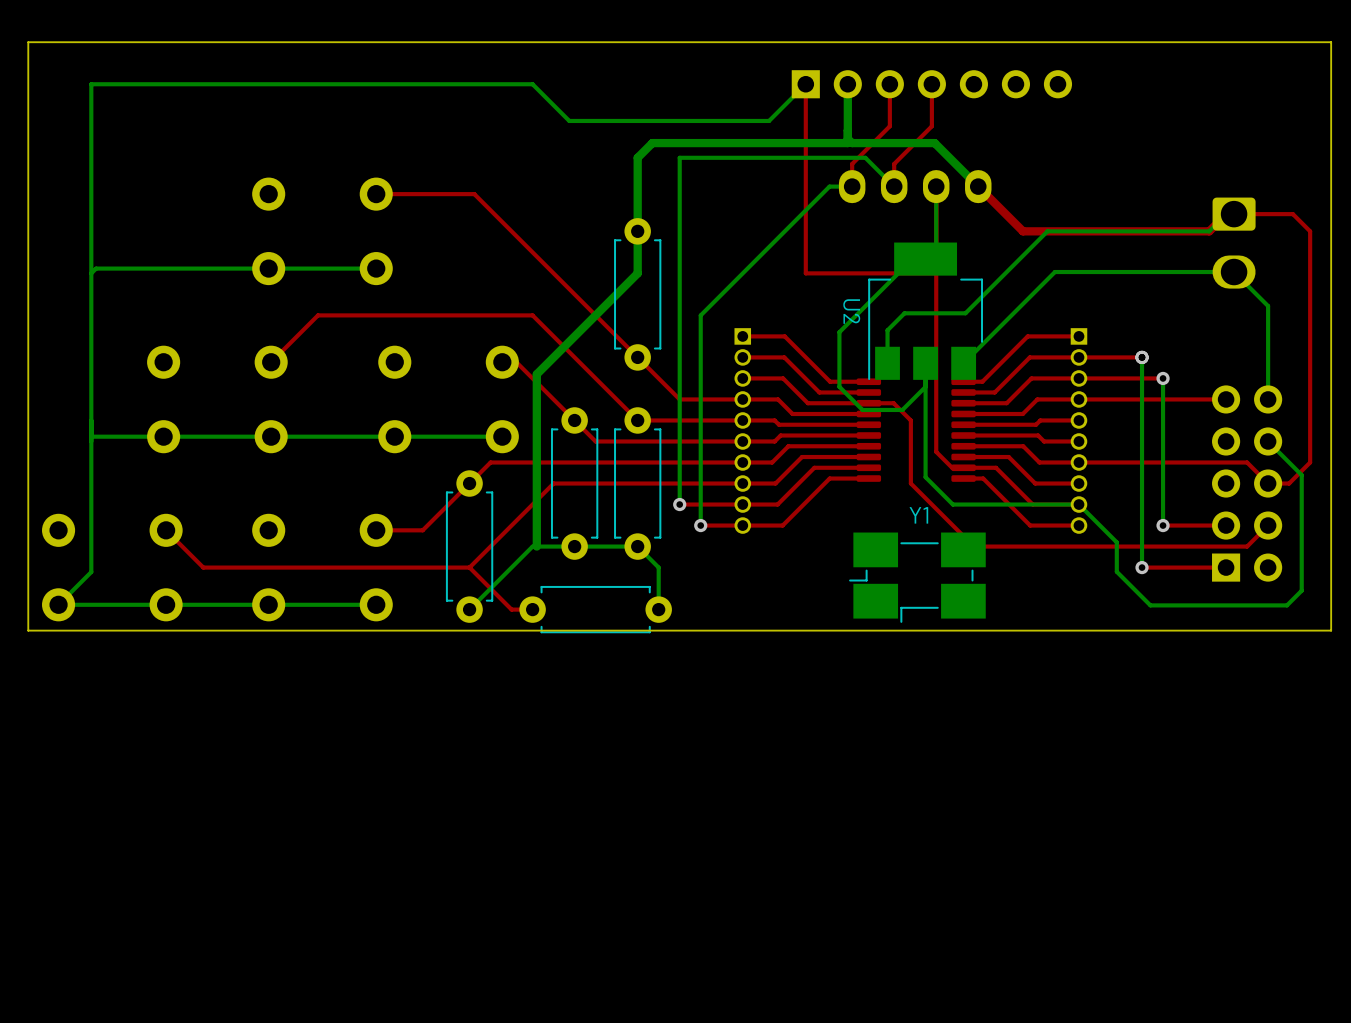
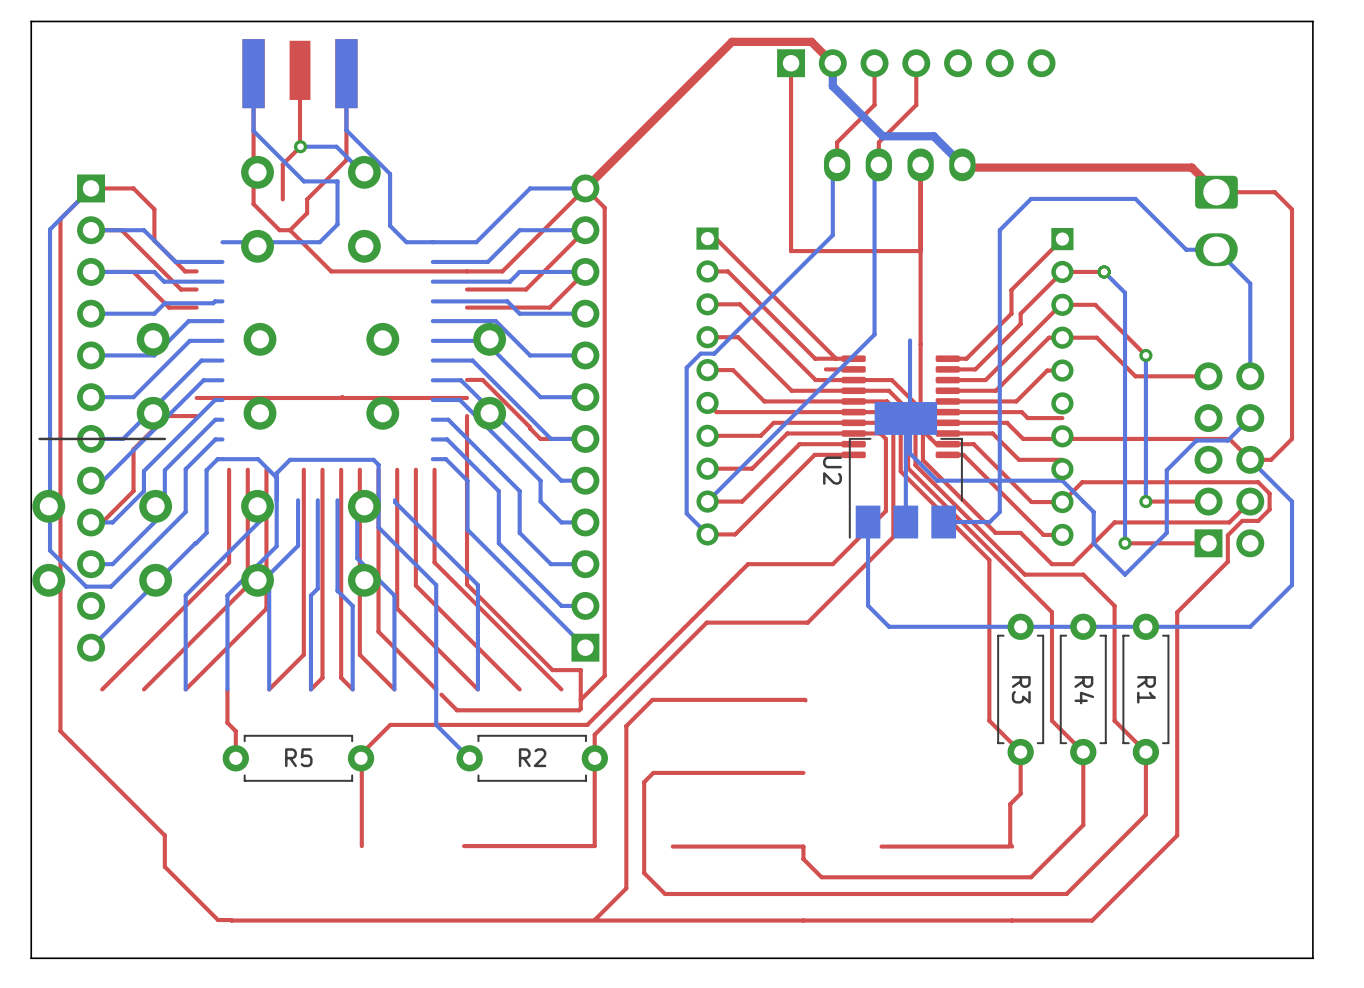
board edge: (40, 42) (28, 42) (28, 630) (1331, 630) -> (31, 21) (31, 958) (1312, 958) (1312, 605)
bottom track: (805, 84) (769, 120) (569, 120) (532, 84) (91, 84) (91, 572) (58, 604) (376, 604) -> none
top track: none -> (832, 63) (811, 41) (732, 41) (592, 181)
top track: none -> (300, 70) (300, 146) (282, 164) (282, 199)
top track: none -> (253, 73) (253, 204) (279, 230) (290, 230)
bottom track: none -> (253, 73) (253, 131) (303, 181) (337, 181) (337, 224) (319, 242) (222, 242)
part: none -> (300, 73)
top track: none -> (346, 73) (346, 160) (307, 199) (307, 213) (290, 230)
bottom track: none -> (346, 73) (346, 130) (390, 174) (390, 225) (406, 242) (476, 242) (530, 188) (585, 188)
bottom track: (847, 107) (847, 143) (652, 143) (637, 157) (637, 273) (536, 374) (536, 546) -> none
bottom track: (847, 138) (852, 143) (934, 143) (949, 157) -> (832, 86) (882, 136) (933, 136)
bottom track: none -> (300, 146) (336, 146) (363, 174) (363, 181)
via: none -> (300, 146)
bottom track: (852, 186) (829, 186) (700, 315) (700, 390) -> (832, 167) (832, 235) (714, 353) (700, 353) (686, 367)
bottom track: (894, 186) (865, 157) (679, 157) (679, 504) -> none
bottom track: (936, 186) (936, 250) (925, 259) (912, 259) (839, 332) (839, 386) (862, 409) (902, 409) (925, 386) -> none
bottom track: none -> (874, 167) (874, 334) (707, 501)
top track: (980, 189) (1023, 231) (1209, 231) (1230, 210) -> (965, 167) (1191, 167) (1212, 188)
top track: (376, 194) (474, 194) (679, 399) (778, 399) (792, 414) (806, 414) -> (707, 337) (738, 337) (791, 390)
bottom track: none -> (91, 188) (50, 229) (50, 550) (86, 586) (111, 586) (185, 512) (185, 469) (215, 439) (222, 439)
bottom track: (1226, 214) (1209, 231) (1047, 231) (965, 313) (904, 313) (887, 330) (887, 363) -> none
top track: none -> (91, 230) (121, 230) (181, 289) (196, 289)
bottom track: none -> (91, 230) (143, 230) (175, 261) (222, 261)
top track: none -> (290, 230) (331, 271) (502, 271) (585, 188) (604, 207) (604, 675) (580, 699)
top track: none -> (585, 230) (526, 289) (467, 289)
bottom track: none -> (585, 230) (519, 230) (487, 261) (432, 261)
top track: none -> (707, 238) (715, 238) (836, 358)
bottom track: (376, 268) (96, 268) (91, 273) -> none
bottom track: (1203, 272) (1054, 272) (963, 363) -> (1186, 249) (1135, 198) (1031, 198) (999, 230) (999, 512) (989, 522) (943, 522)
top track: none -> (91, 271) (133, 271) (169, 307) (196, 307)
bottom track: none -> (91, 271) (154, 271) (164, 281) (222, 281)
top track: none -> (585, 271) (549, 307) (467, 307)
bottom track: none -> (585, 271) (519, 271) (509, 281) (432, 281)
part: (637, 294) -> none
bottom track: none -> (1104, 271) (1125, 292) (1125, 334)
U2 position: (925, 311) -> (905, 470)
bottom track: none -> (222, 301) (213, 303) (164, 303) (154, 313) (91, 313)
bottom track: none -> (432, 301) (507, 301) (519, 313) (585, 313)
top track: (784, 336) (742, 336) -> (770, 313) (727, 271) (707, 271)
top track: (1078, 336) (1027, 336) -> (1062, 239) (1011, 290) (1011, 313)
bottom track: none -> (222, 321) (188, 321) (154, 355) (91, 355)
bottom track: none -> (432, 321) (495, 321) (530, 355) (585, 355)
top track: (742, 357) (784, 357) (819, 392) (840, 392) -> none
top track: (1142, 357) (1029, 357) (994, 392) (991, 392) -> (1104, 271) (1062, 271) (1020, 313) (1020, 324) (975, 369)
via position: (1142, 357) -> (1104, 271)
top track: (271, 362) (318, 315) (532, 315) (637, 420) (774, 420) -> (707, 370) (733, 370) (760, 397)
top track: (502, 362) (516, 362) (595, 441) (774, 441) (780, 435) -> (707, 402) (716, 412) (766, 412)
bottom track: none -> (222, 340) (189, 340) (133, 397) (91, 397)
bottom track: none -> (432, 340) (484, 340) (540, 397) (585, 397)
top track: (742, 378) (783, 378) (807, 403) (830, 403) -> (707, 304) (739, 304) (815, 380)
top track: (1163, 378) (1031, 378) (1006, 403) (1001, 403) -> (1145, 355) (1095, 304) (1060, 304) (985, 380)
bottom track: none -> (222, 360) (201, 360) (123, 438) (91, 438)
bottom track: none -> (432, 360) (472, 360) (551, 438) (585, 438)
top track: (1152, 399) (1037, 399) (1022, 414) (1012, 414) -> (1135, 376) (1096, 337) (1048, 337) (995, 390)
bottom track: none -> (222, 380) (203, 380) (103, 480) (91, 480)
bottom track: none -> (432, 380) (461, 380) (561, 480) (585, 480)
top track: (893, 403) (904, 414) -> (853, 390) (888, 390)
part: none -> (707, 386)
part: none -> (1062, 387)
top track: (910, 420) (910, 483) (973, 546) (1131, 546) -> (878, 380) (891, 380) (922, 411) (922, 460) (995, 532) (1020, 532) (1051, 564) (1072, 564) (1114, 522)
top track: none -> (895, 397) (915, 417) (915, 465) (1024, 574) (1083, 574) (1114, 605) (1114, 720) (1145, 752) (1145, 814) (1066, 893) (665, 893) (644, 873) (644, 782) (653, 772) (803, 772)
top track: (1078, 420) (1040, 420) (1036, 424) (1032, 424) -> (1062, 370) (1047, 370) (1016, 401)
top track: none -> (467, 397) (196, 397)
bottom track: none -> (222, 400) (215, 400) (143, 471) (143, 491) (112, 522) (91, 522)
bottom track: none -> (432, 400) (459, 400) (467, 407)
top track: none -> (853, 401) (887, 401) (908, 422) (908, 468) (1051, 612) (1051, 720) (1083, 752) (1083, 825) (1031, 877) (822, 877)
part: (742, 430) -> none
part: (1078, 430) -> none
top track: none -> (853, 412) (885, 412) (900, 427) (900, 471) (989, 560) (989, 720) (1020, 752) (1020, 793) (1010, 804) (1010, 844) (1012, 846)
bottom track: (502, 436) (91, 436) -> none
top track: none -> (196, 416) (166, 416) (133, 449) (133, 491) (102, 522) (91, 522)
top track: none -> (467, 416) (467, 584) (552, 670) (580, 670) (580, 708) (579, 710) (457, 710) (441, 694)
part: none -> (91, 418)
part: none -> (585, 418)
bottom track: none -> (905, 418) (905, 522)
bottom track: (1268, 441) (1301, 475) (1301, 590) (1287, 605) (1150, 605) (1116, 571) (1116, 542) (1110, 536) -> (1250, 418) (1227, 440) (1196, 440) (1166, 470) (1166, 532) (1125, 574) (1093, 543) (1093, 512)
bottom track: none -> (222, 419) (215, 419) (164, 470) (164, 512) (112, 564) (91, 564)
bottom track: none -> (432, 419) (448, 419) (519, 491) (519, 532) (551, 564) (585, 564)
top track: none -> (853, 422) (883, 422) (893, 432) (893, 537) (807, 622) (706, 622) (594, 734) (594, 846) (464, 846)
top track: none -> (853, 433) (880, 433) (885, 438) (885, 511) (832, 564) (747, 564) (587, 724) (390, 724) (361, 753) (361, 846)
top track: (775, 459) (772, 462) (598, 462) -> (760, 435) (707, 435)
line: none -> (164, 438) (39, 438)
top track: (553, 462) (490, 462) (422, 530) (376, 530) -> (540, 438) (482, 379) (467, 379)
bottom track: none -> (432, 439) (447, 439) (498, 491) (498, 543) (561, 605) (585, 605)
top track: (989, 467) (996, 467) (1032, 504) (1078, 504) -> (973, 444) (1031, 502) (1062, 502) (1082, 482) (1258, 482) (1269, 493) (1269, 509) (1258, 520) (1242, 520) (1227, 535) (1227, 561) (1177, 612) (1177, 835) (1092, 920) (218, 920) (164, 866) (164, 835) (60, 731) (60, 219) (91, 188) (133, 188) (154, 209) (154, 240) (185, 271) (196, 271)
top track: (979, 478) (983, 478) (1030, 525) (1078, 525) -> (963, 454) (1043, 534) (1062, 534)
bottom track: none -> (432, 459) (445, 459) (467, 480) (467, 529) (585, 647)
part: (574, 483) -> none
part: (637, 483) -> none
top track: (775, 483) (553, 483) (469, 567) -> (760, 459) (752, 468) (707, 468)
bottom track: none -> (1250, 459) (1292, 501) (1292, 585) (1250, 626) (889, 626) (868, 605) (868, 522)
top track: none -> (229, 469) (229, 562) (102, 689)
top track: none -> (247, 469) (247, 585) (143, 689)
top track: none -> (266, 469) (266, 608) (185, 689)
top track: none -> (303, 469) (303, 654) (269, 689)
top track: none -> (322, 469) (322, 677) (310, 689)
top track: none -> (341, 469) (341, 677) (352, 689)
top track: none -> (359, 469) (359, 654) (394, 689)
top track: none -> (378, 469) (378, 631) (436, 689)
top track: none -> (397, 469) (397, 608) (477, 689)
top track: none -> (415, 469) (415, 585) (519, 689)
top track: none -> (434, 469) (434, 562) (561, 689)
bottom track: none -> (276, 477) (258, 459) (217, 459) (206, 470) (206, 532) (91, 647)
via: (679, 504) -> none
top track: (777, 504) (679, 504) -> none
bottom track: none -> (260, 500) (260, 520) (185, 595) (185, 689)
bottom track: none -> (298, 500) (298, 545) (269, 574) (269, 689)
bottom track: none -> (317, 500) (317, 588) (310, 595) (310, 689)
bottom track: none -> (337, 500) (337, 590) (352, 605) (352, 689)
bottom track: none -> (357, 500) (357, 558) (394, 595) (394, 689)
bottom track: none -> (395, 500) (477, 585) (477, 689)
bottom track: none -> (686, 501) (686, 513) (707, 534)
via: (700, 525) -> none
top track: (721, 525) (700, 525) -> none
top track: (782, 525) (756, 525) -> (763, 480) (742, 501)
top track: none -> (768, 501) (735, 534) (707, 534)
top track: (166, 530) (203, 567) (469, 567) -> none
part: (469, 546) -> none
bottom track: (574, 546) (532, 546) (469, 609) -> (561, 522) (540, 501) (540, 480) (468, 408)
bottom track: (598, 546) (637, 546) (658, 567) (658, 609) -> none
top track: (469, 567) (511, 609) (532, 609) -> none
Y1: (917, 577) -> none
part: (595, 609) -> none
top track: none -> (227, 689) (227, 722) (235, 731) (235, 758)
bottom track: none -> (227, 689) (227, 595) (276, 546) (276, 473) (290, 459) (373, 459) (378, 464) (378, 527) (436, 585) (436, 724) (469, 758)
R3: none -> (1020, 689)
R4: none -> (1083, 689)
R1: none -> (1145, 689)
top track: none -> (805, 700) (652, 699) (626, 726) (626, 888) (594, 920)
R5: none -> (298, 758)
R2: none -> (532, 758)
top track: none -> (672, 846) (803, 846) (803, 859) (821, 877)
top track: none -> (1009, 846) (881, 846)

